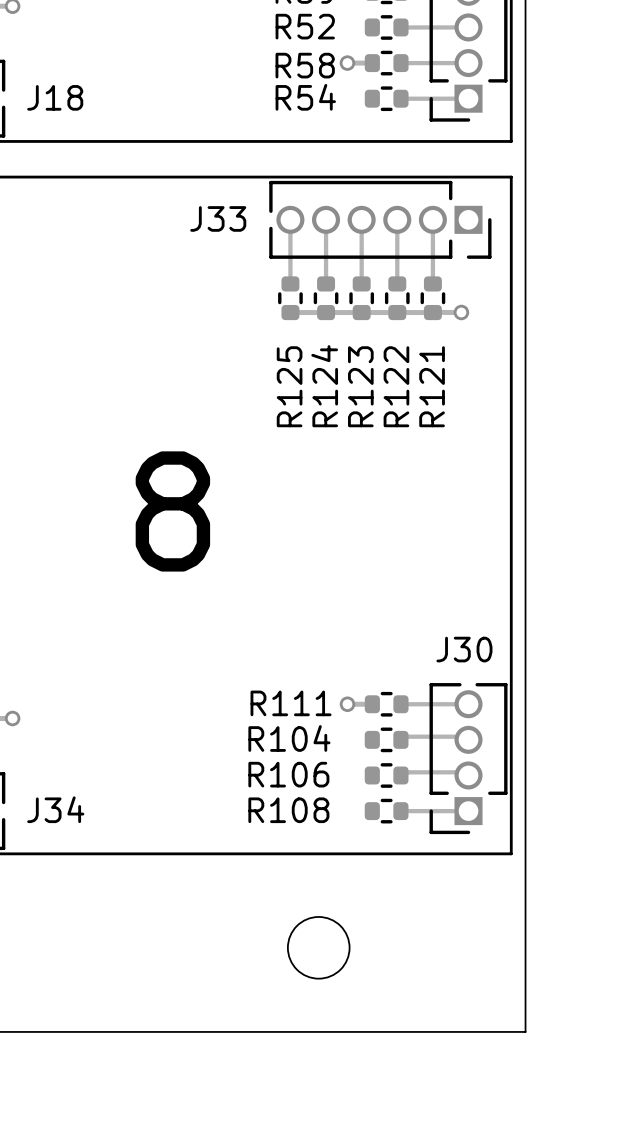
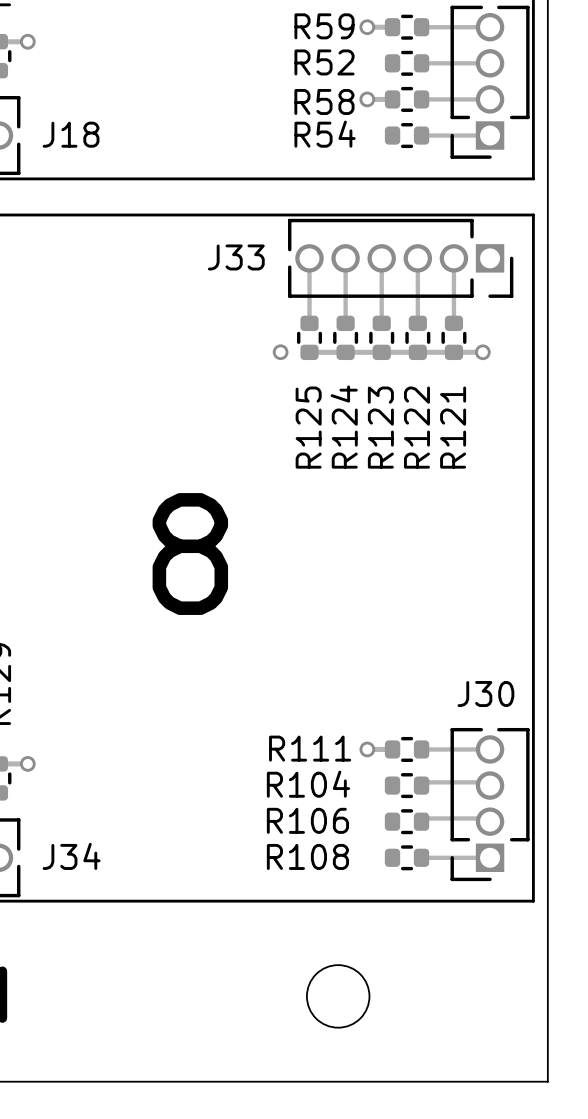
via: none -> (280, 352)

